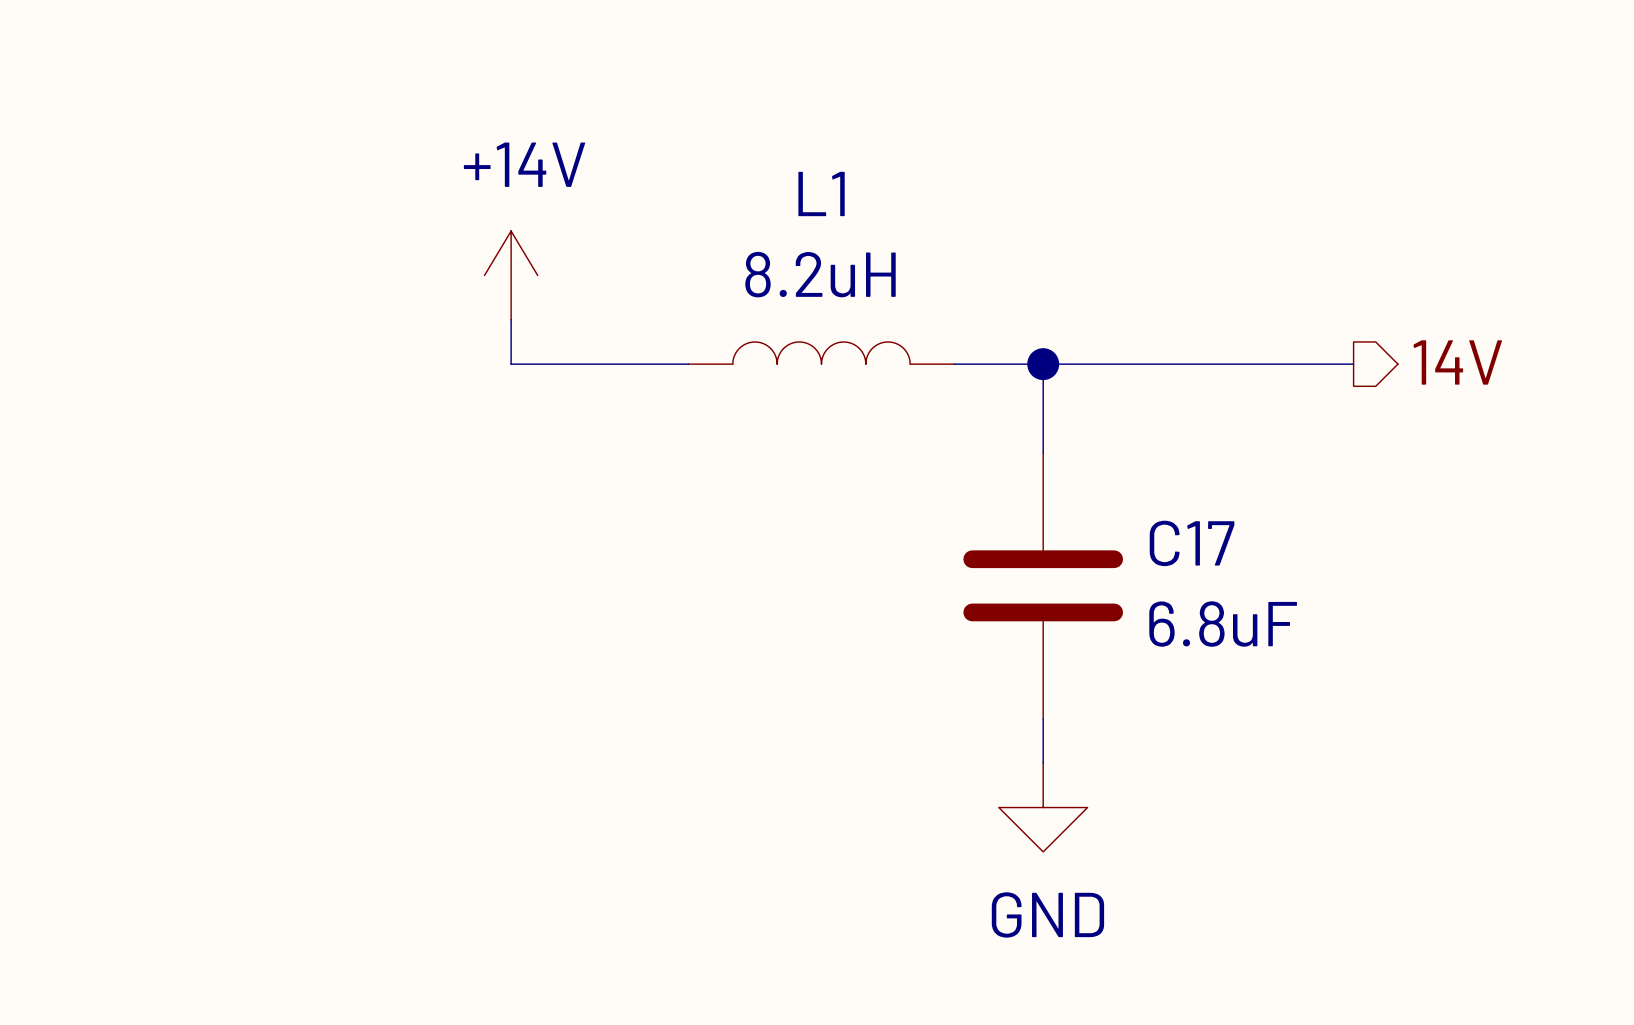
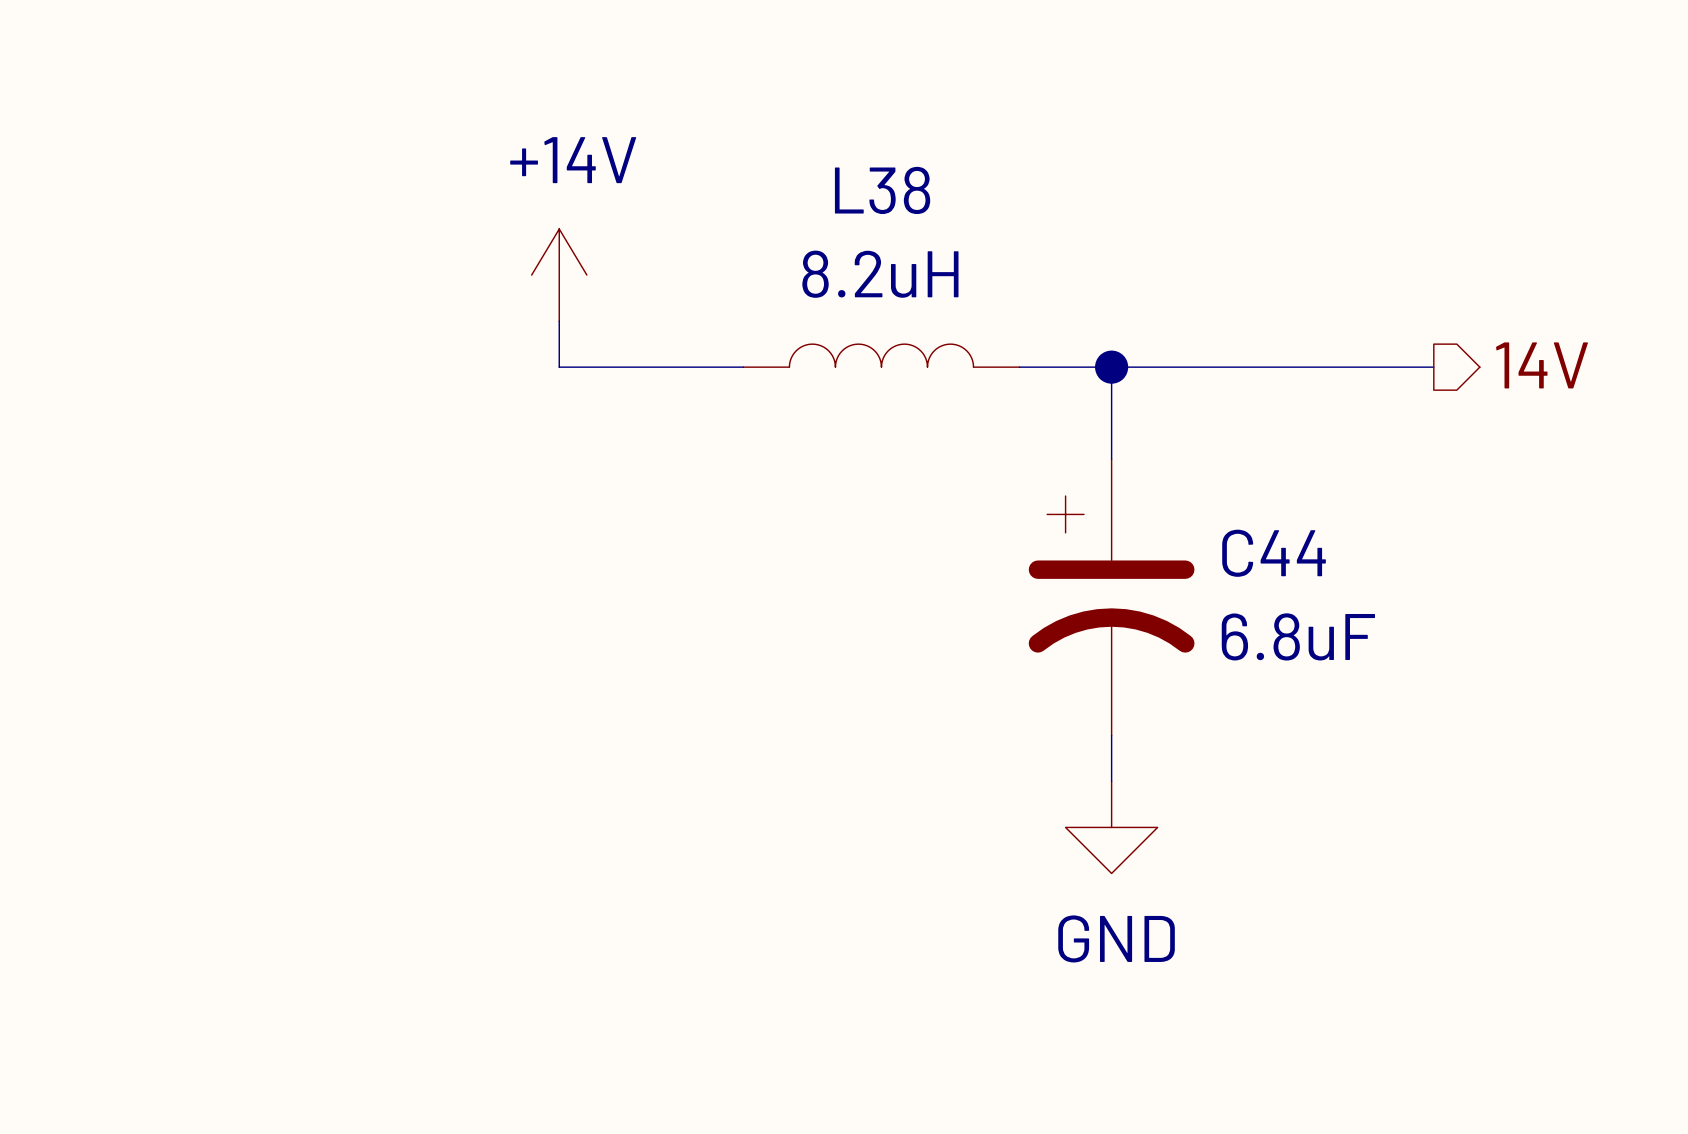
L1 name: L1 (821, 193) -> L38 (882, 190)
C17: 6.8uF (1043, 585) -> none
C44: none -> 6.8uF (1111, 597)

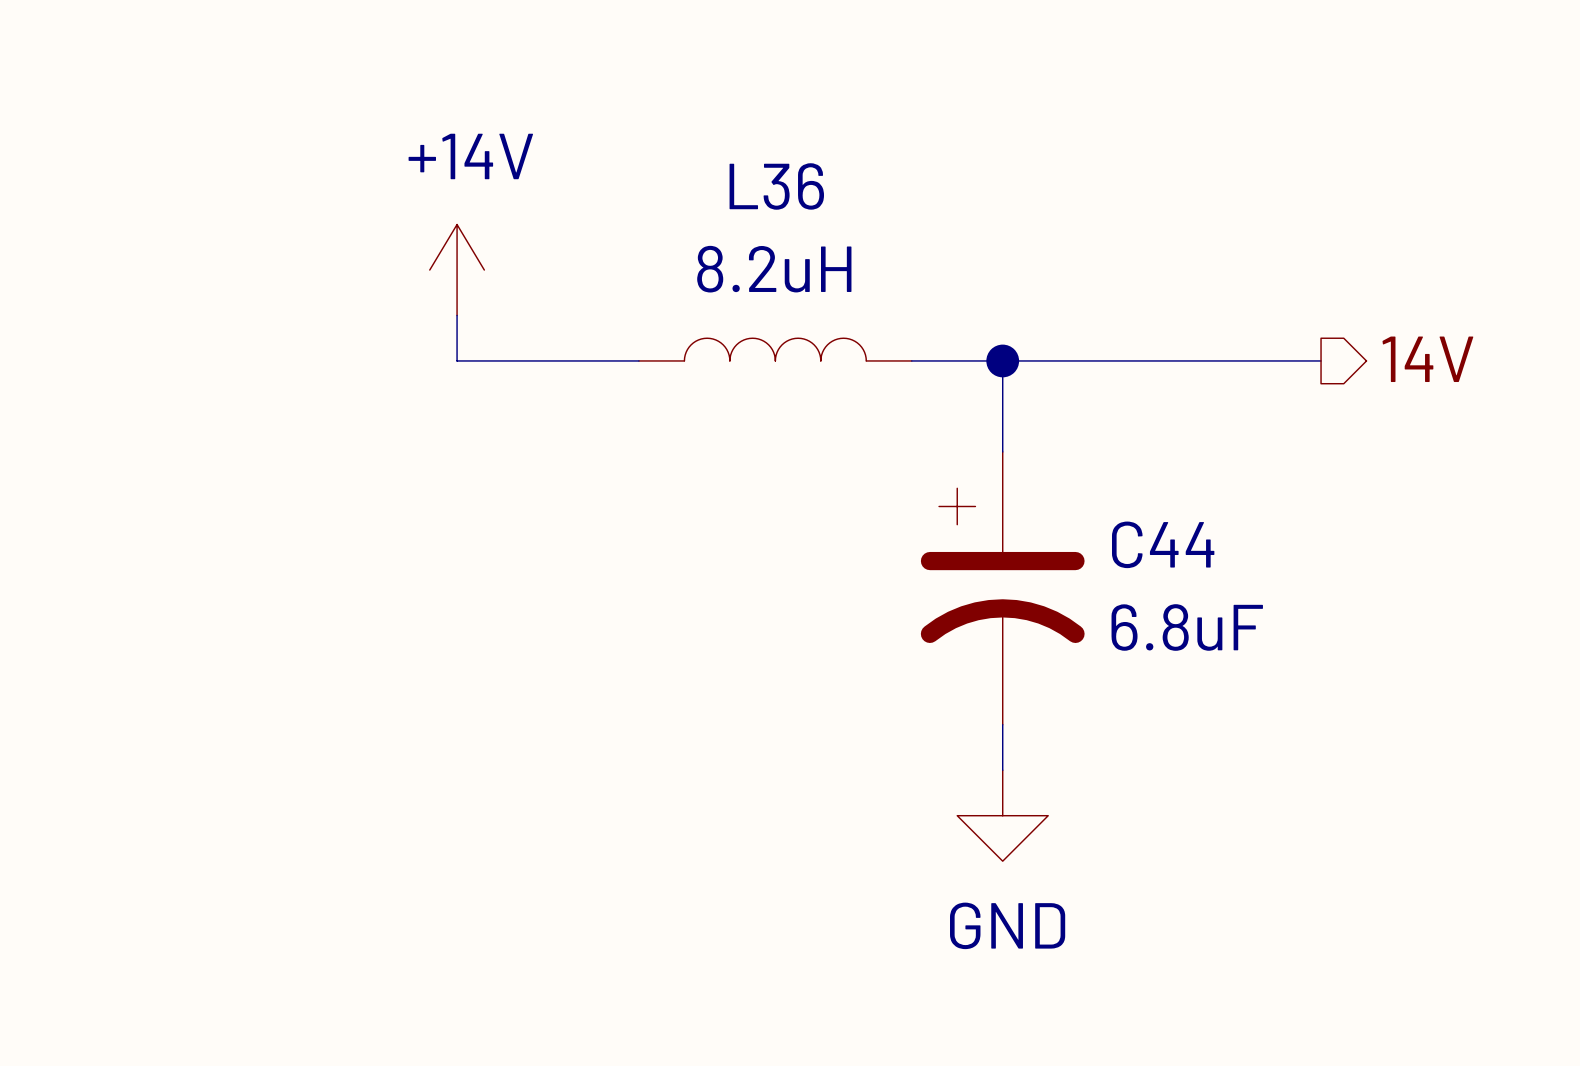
L38 name: L38 (882, 190) -> L36 (776, 186)

